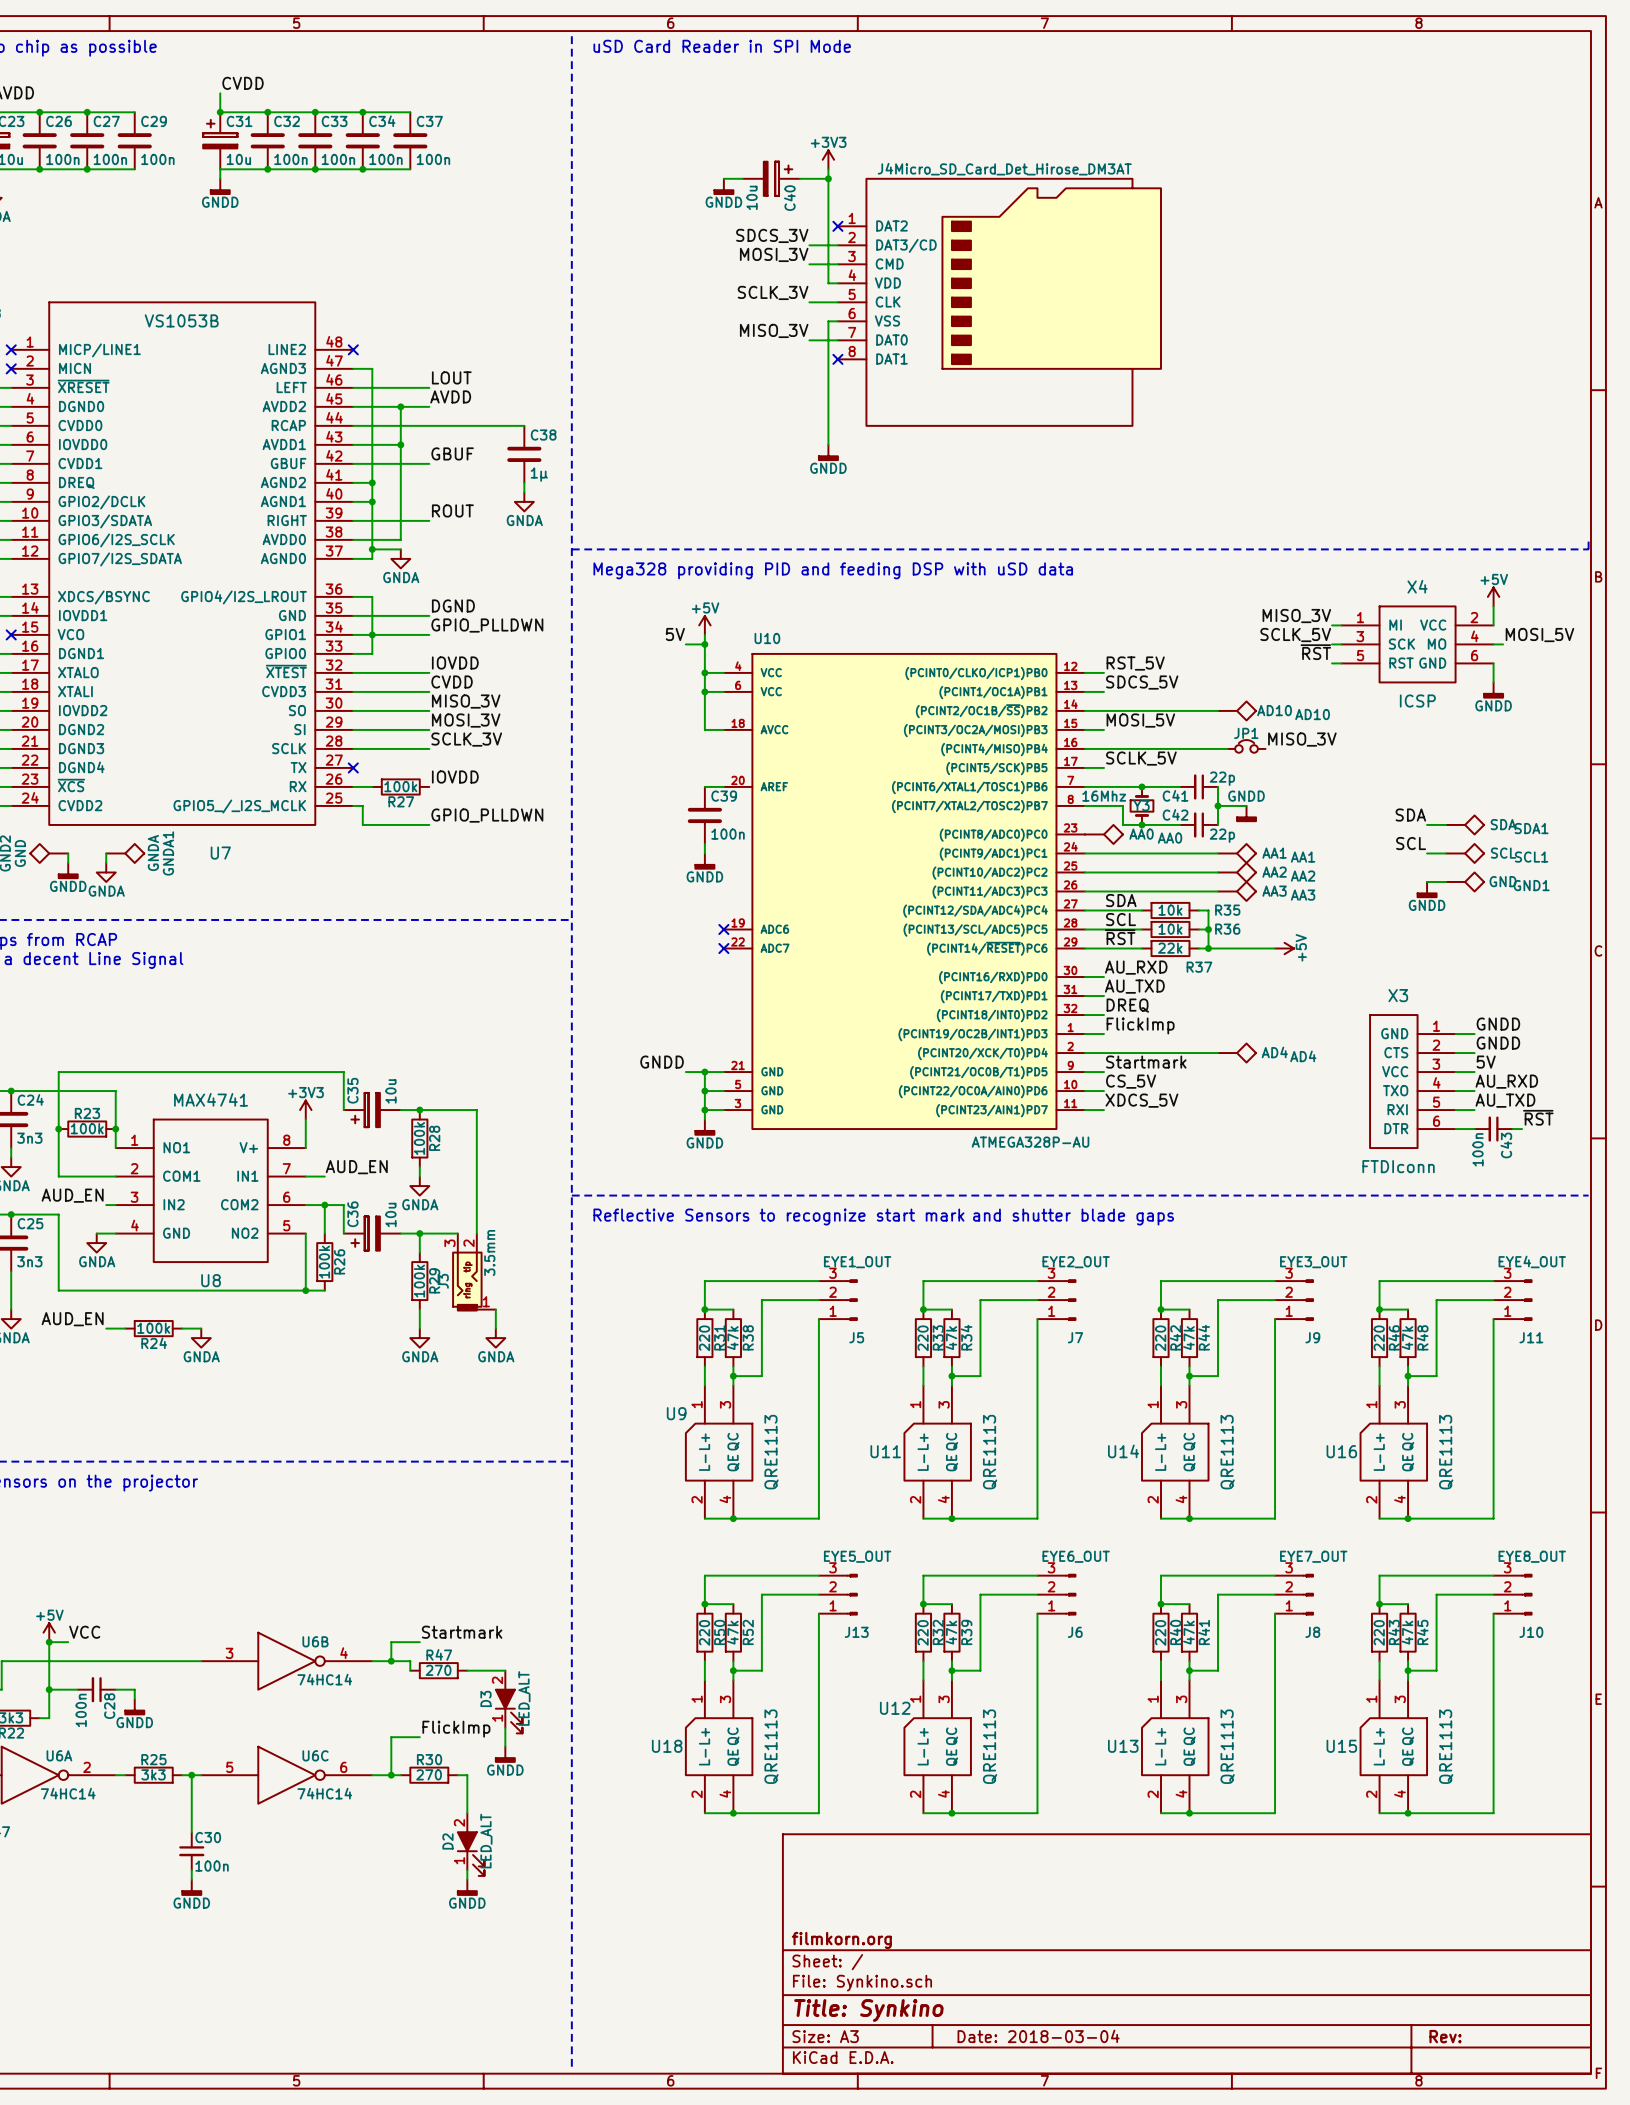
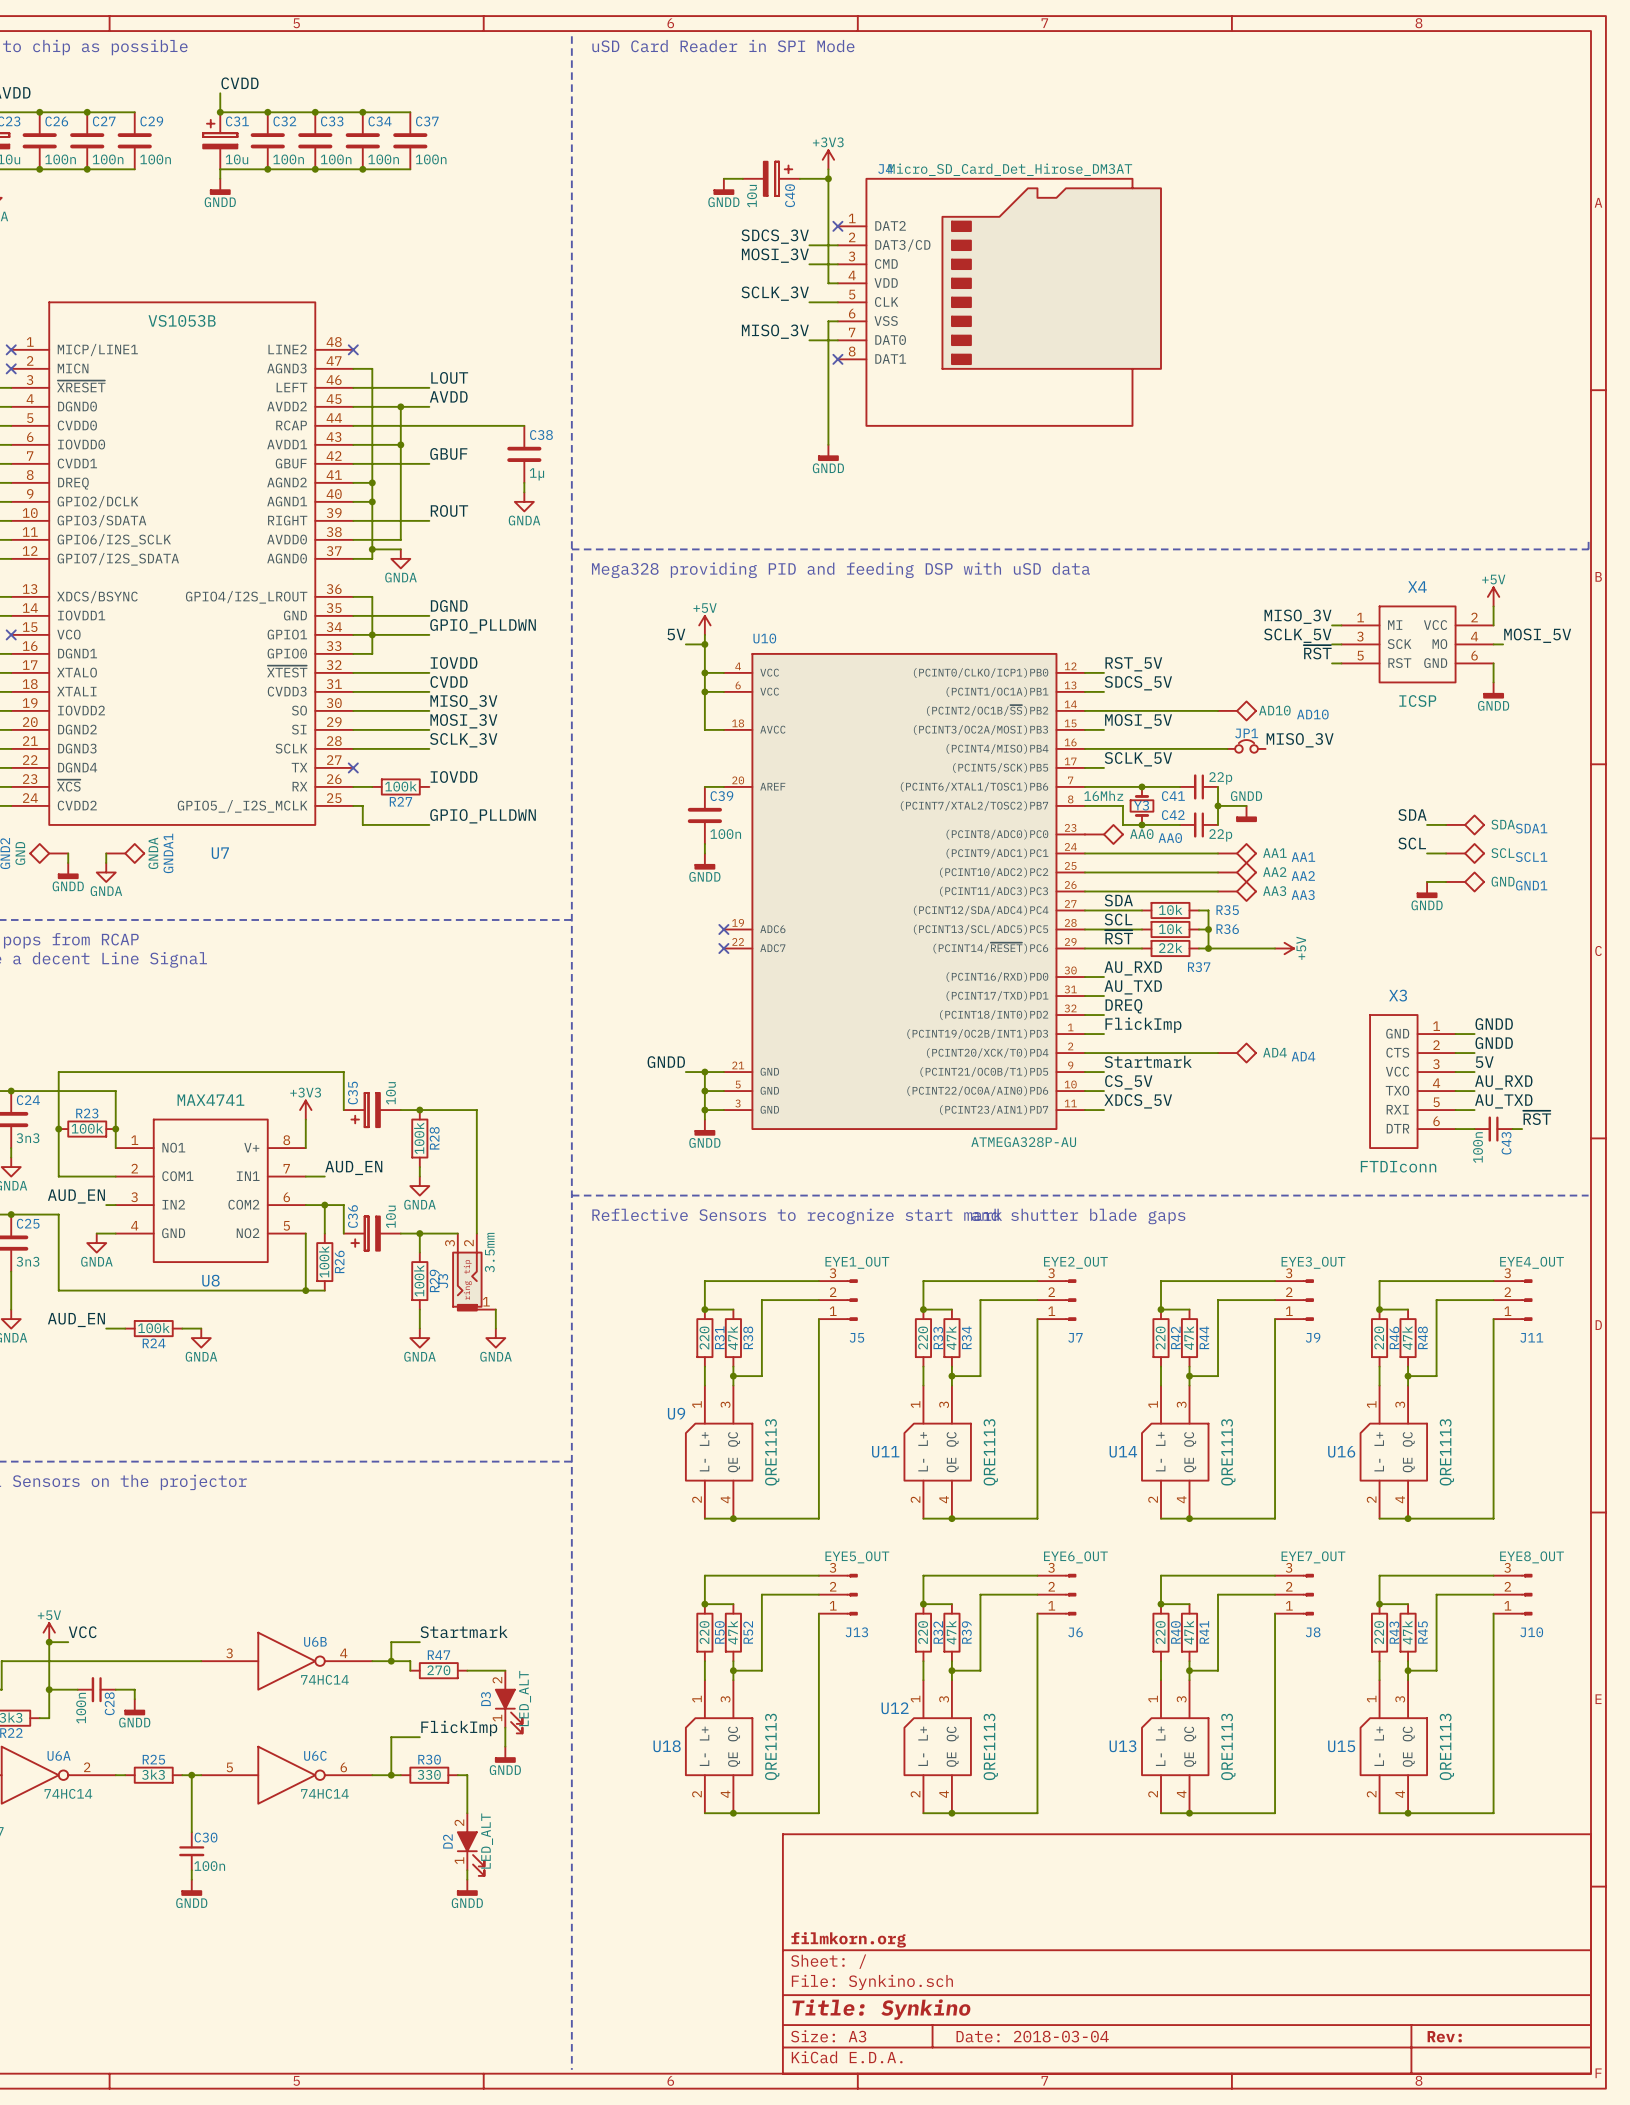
R30 value: 270 (429, 1774) -> 330 (429, 1774)

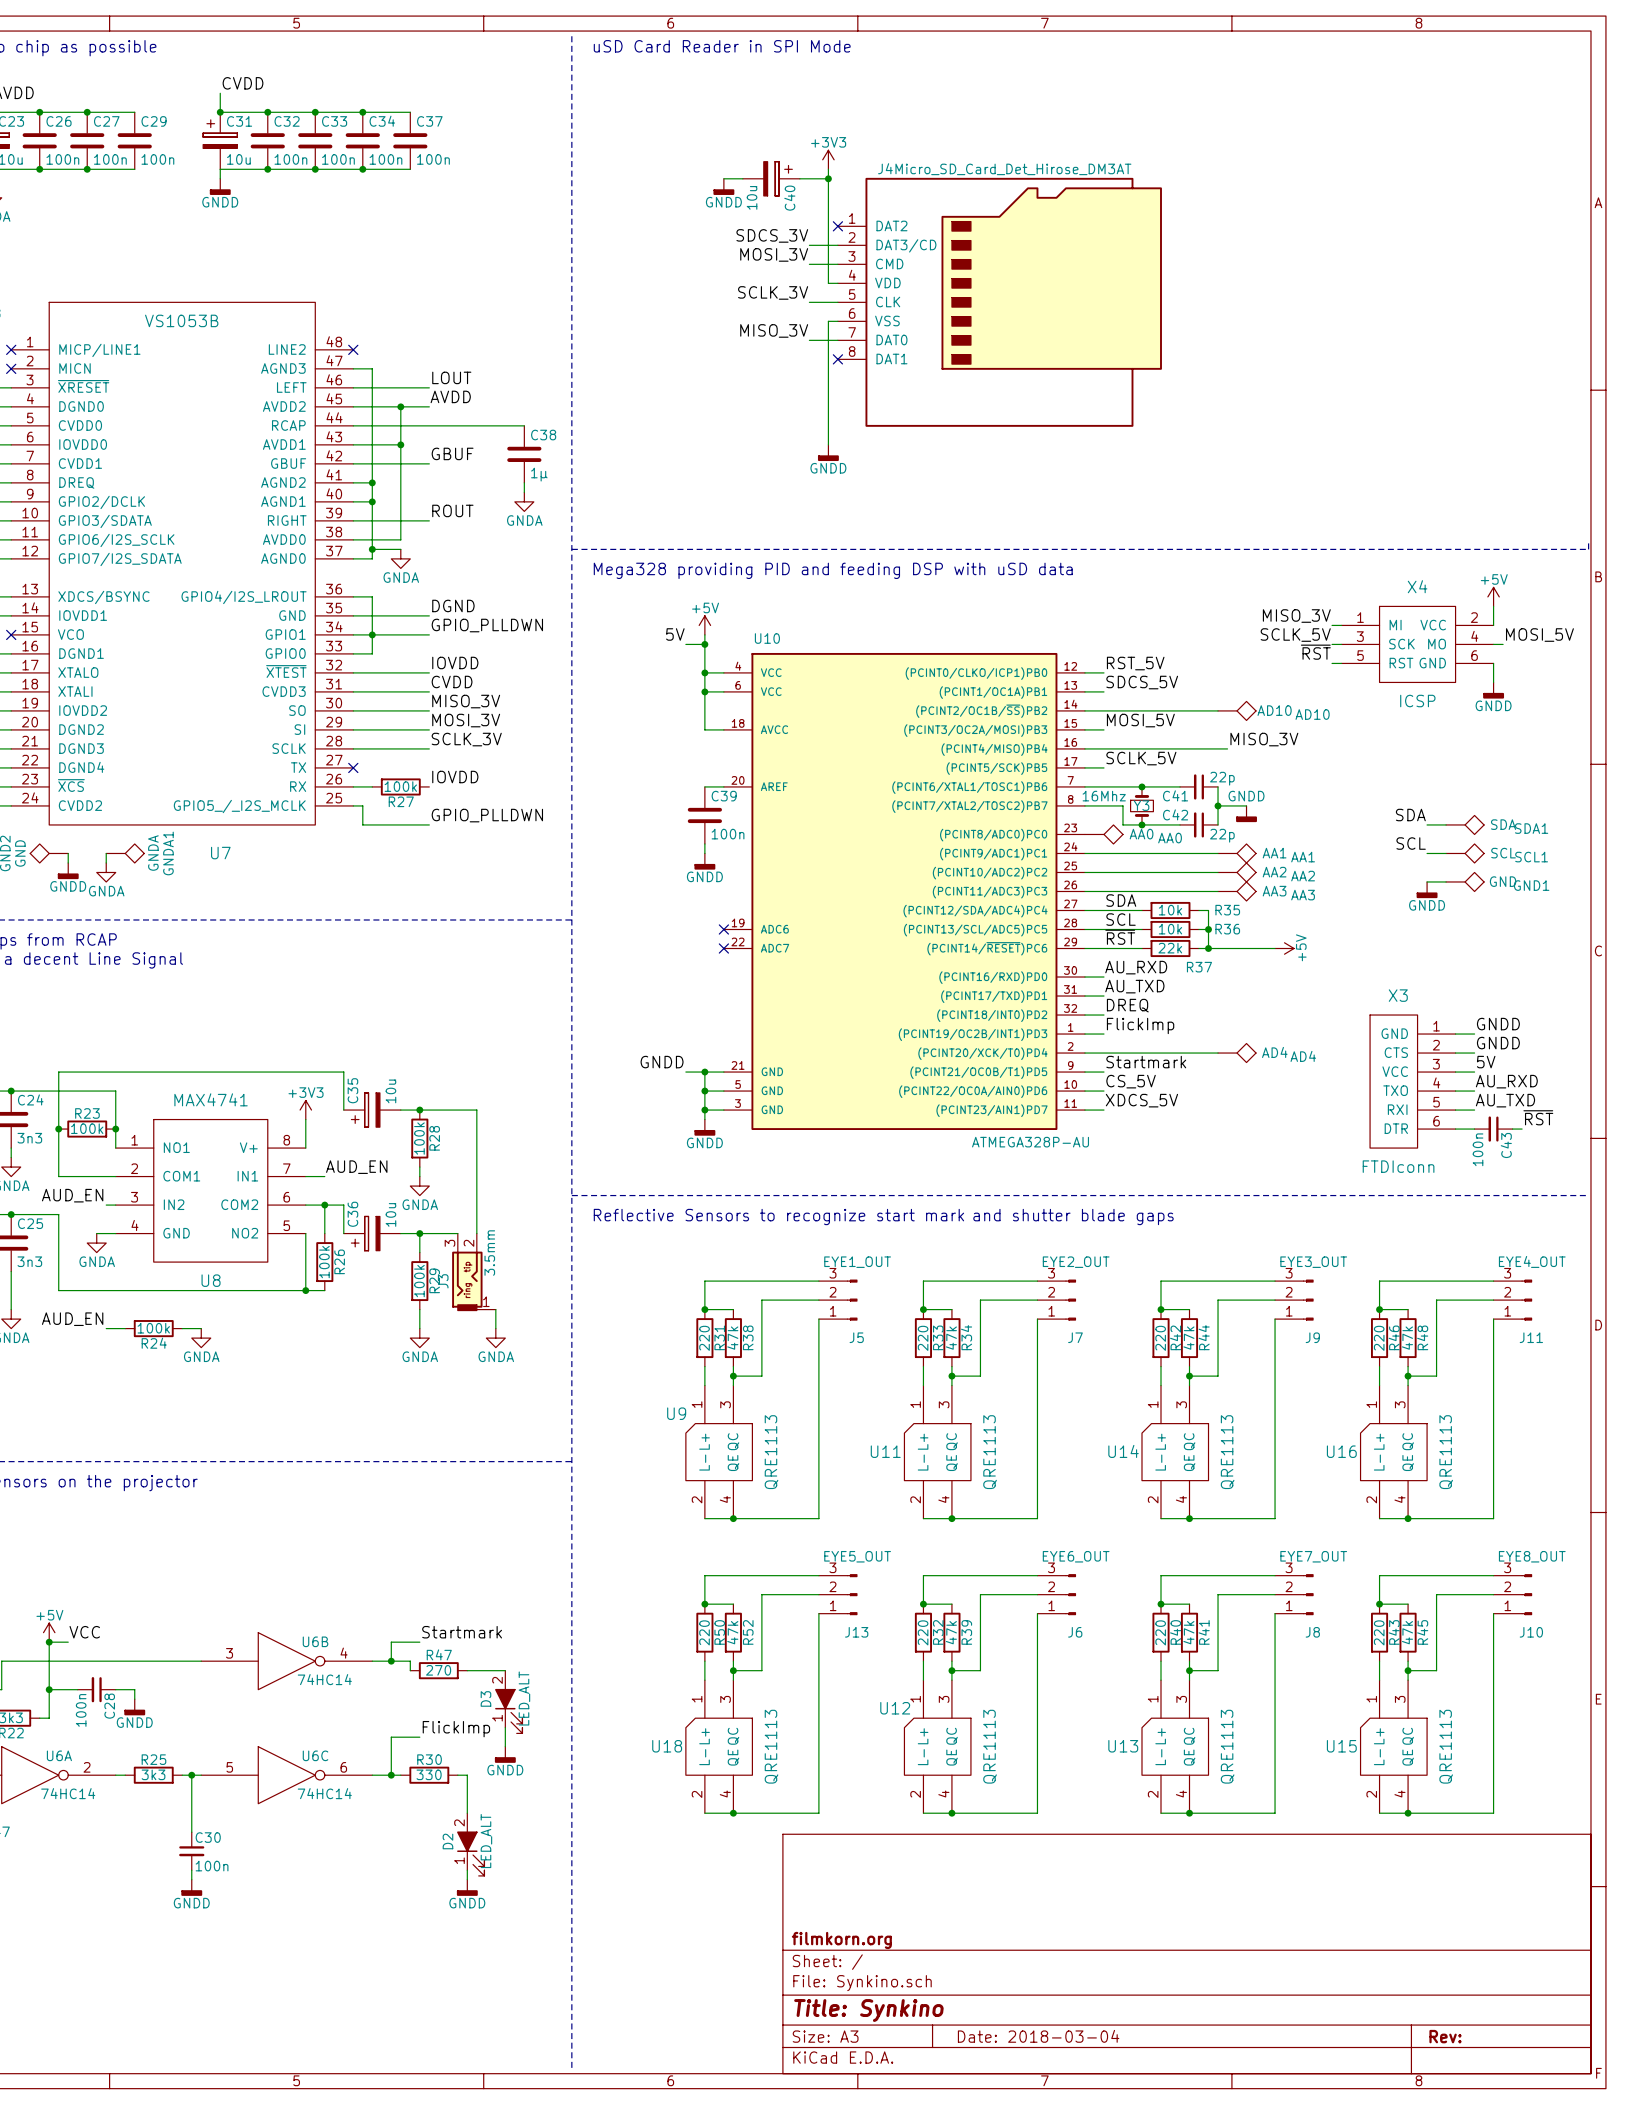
label position: MISO_3V (1300, 740) -> MISO_3V (1264, 739)
JP1: (1246, 746) -> none

